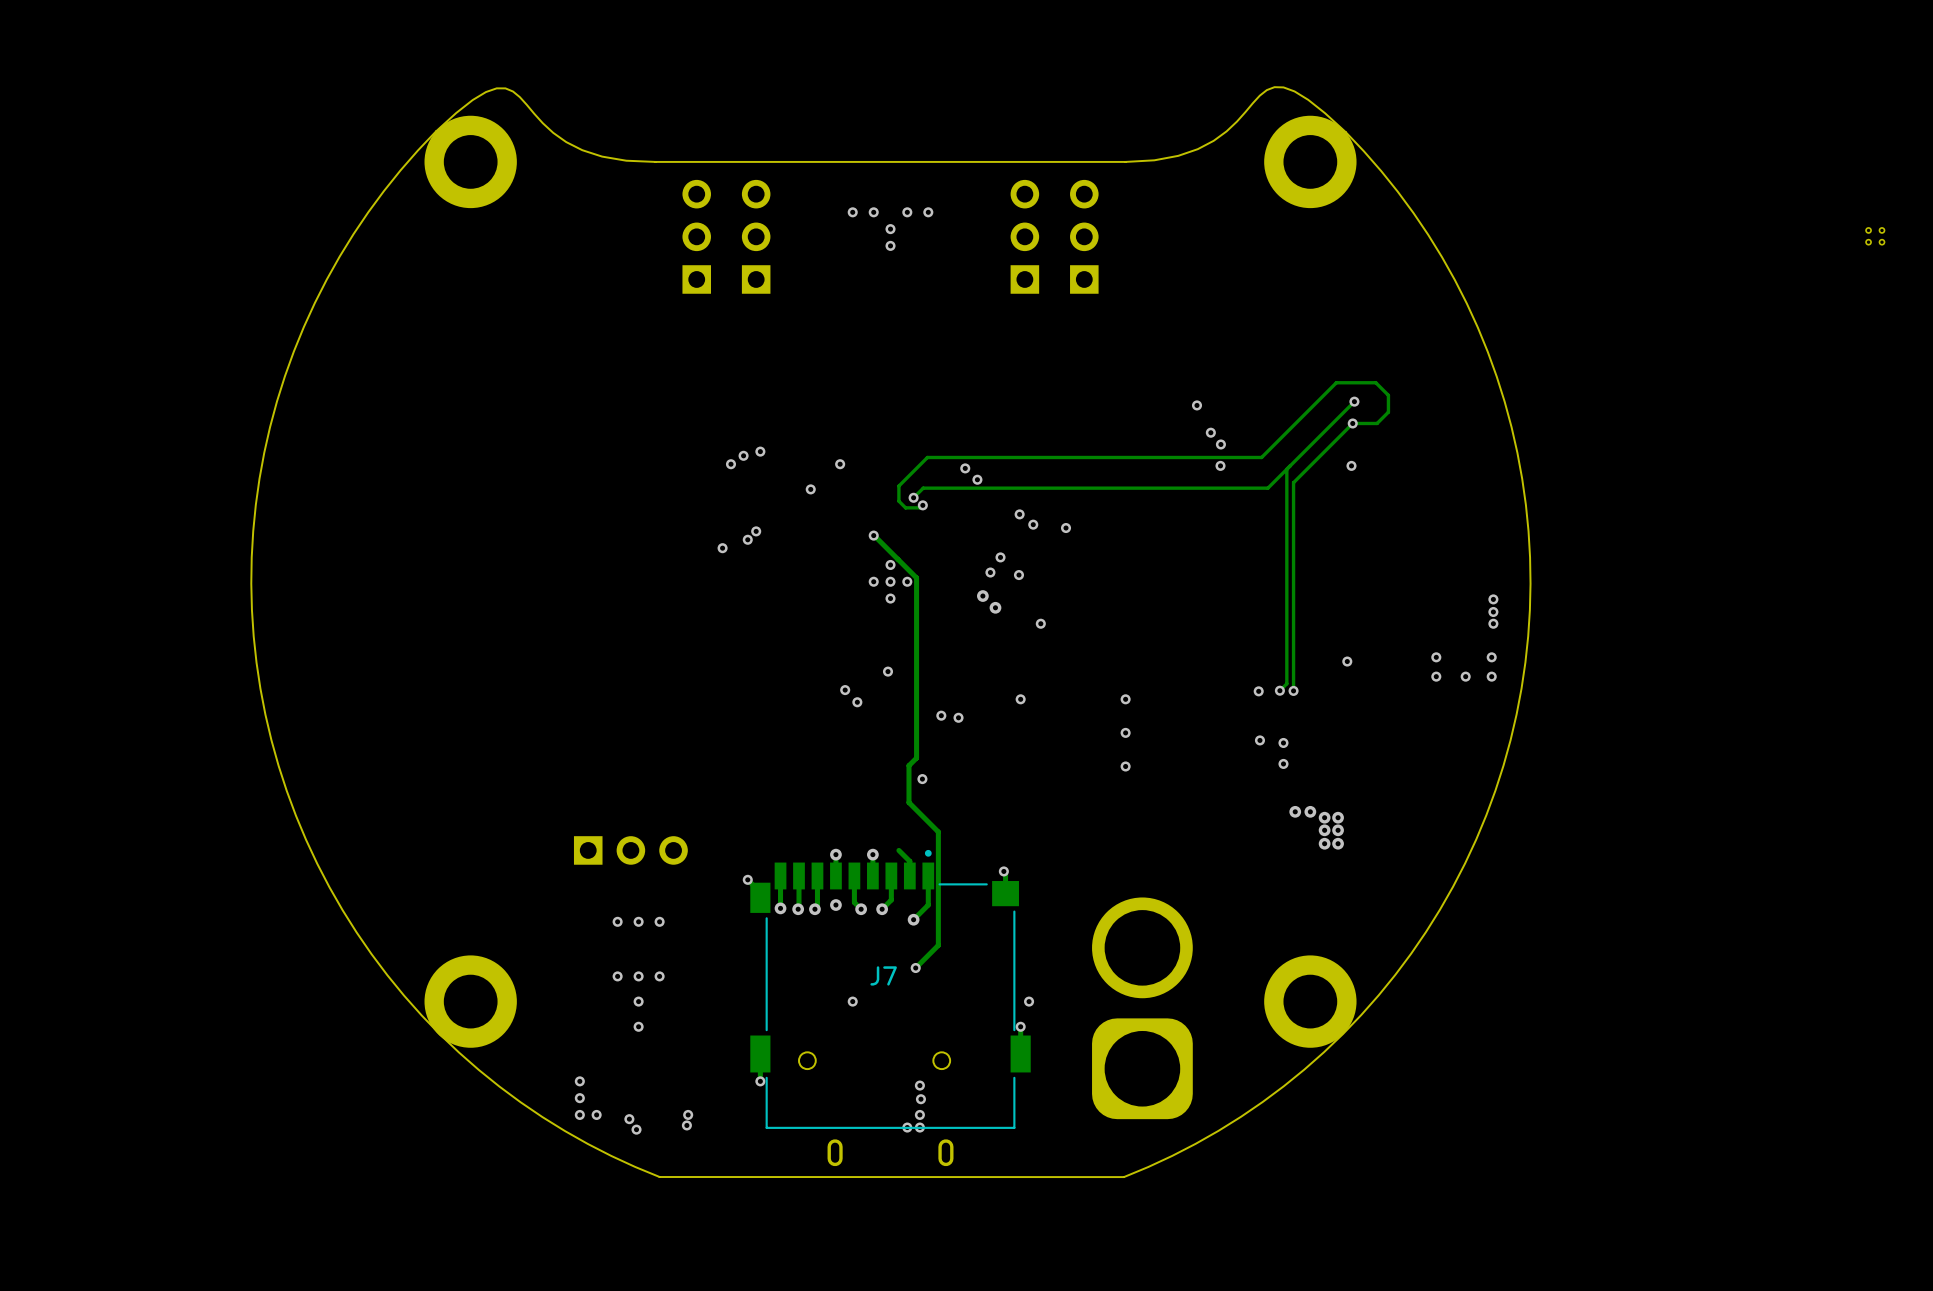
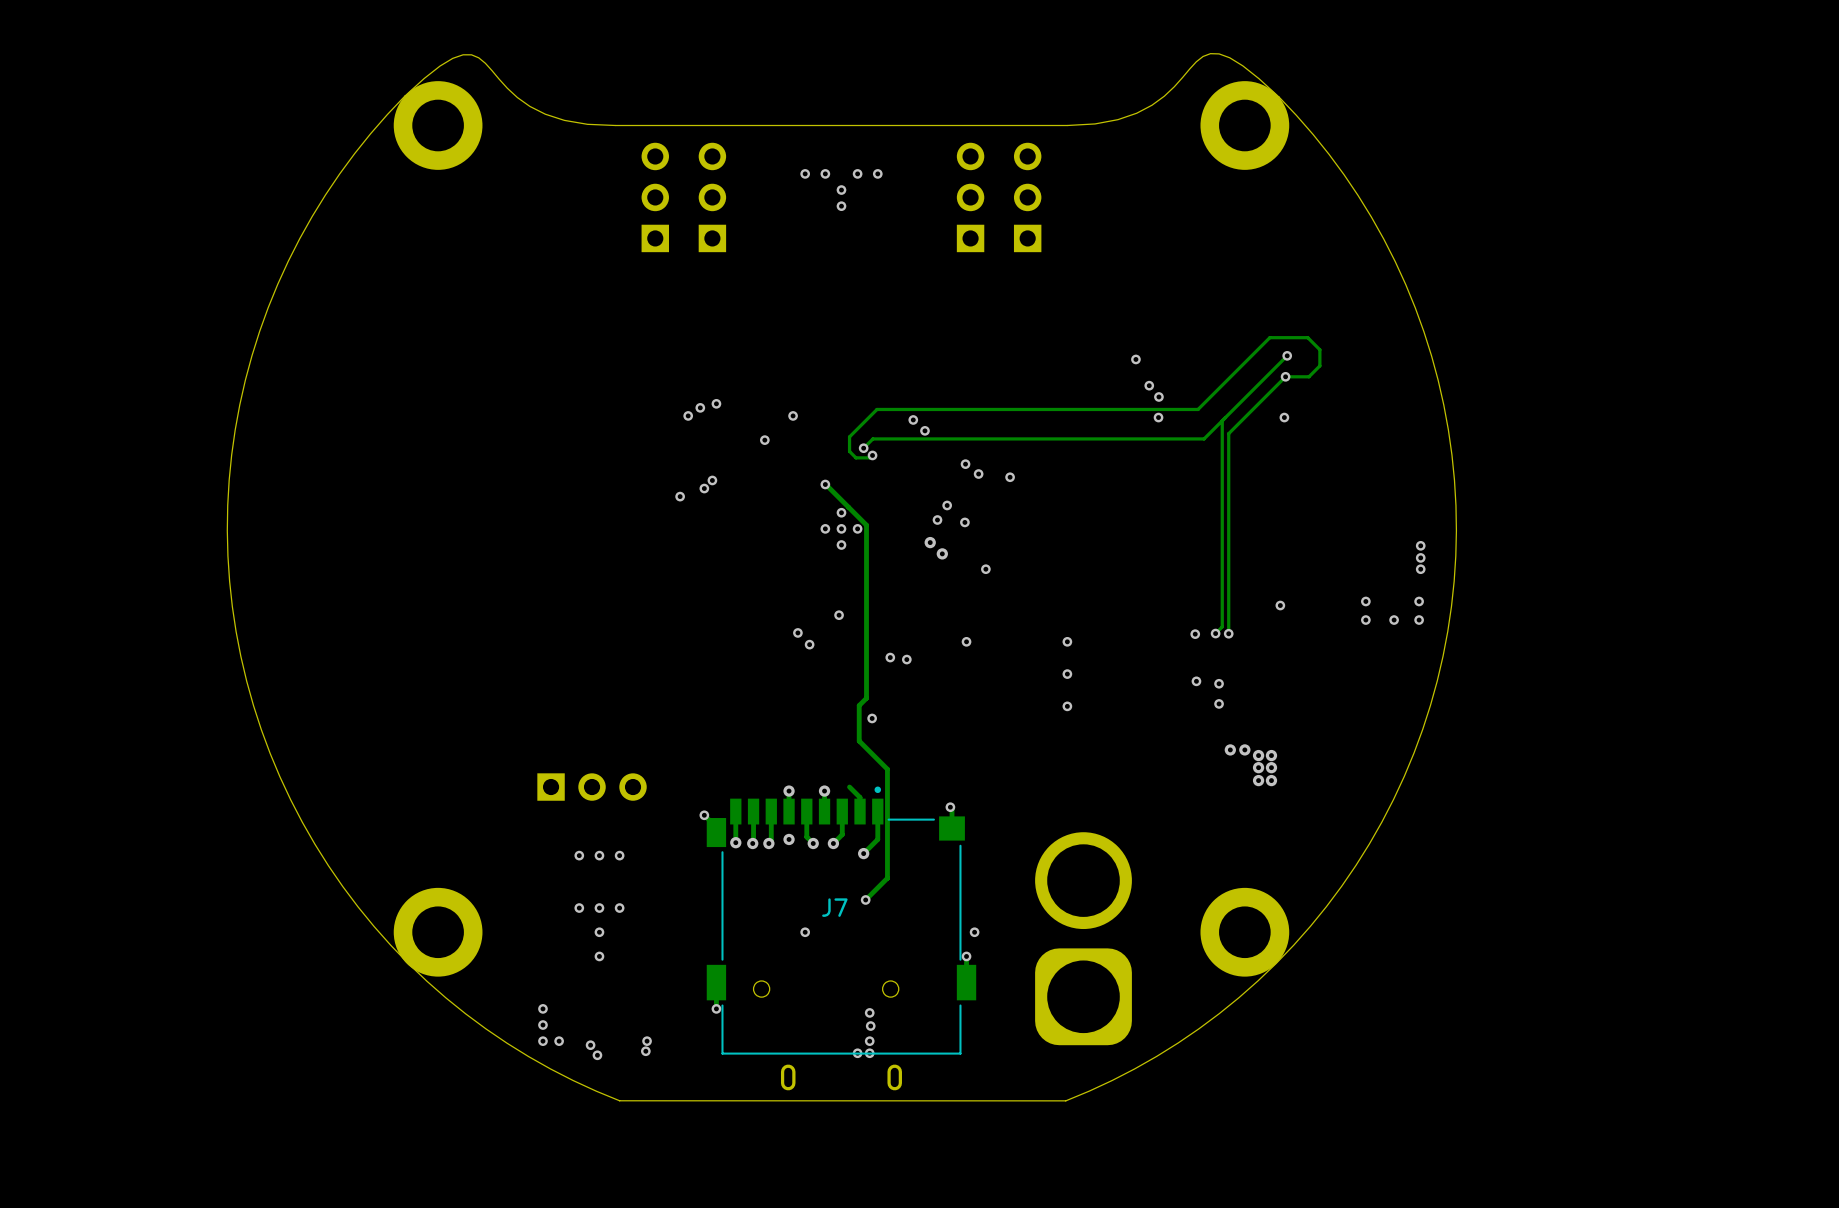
part: (1875, 236) -> none

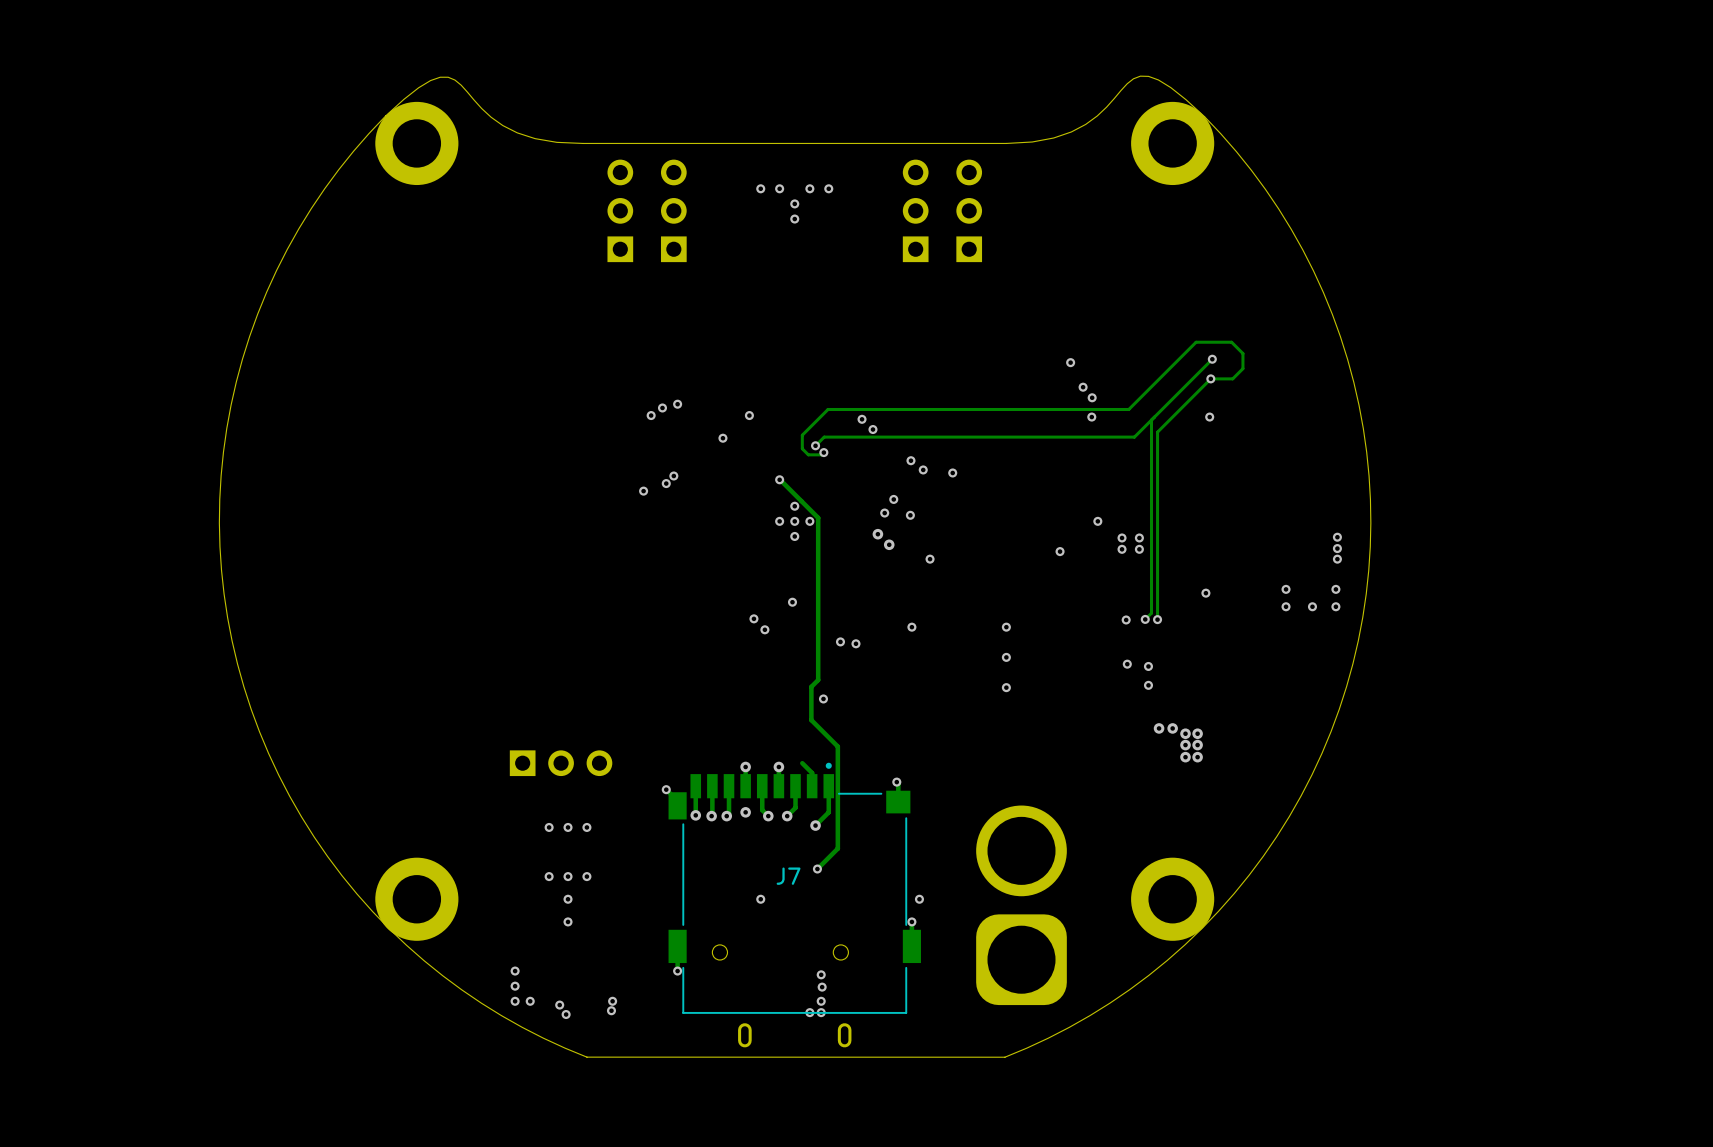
via: none -> (1097, 521)
via: none -> (1122, 537)
via: none -> (1139, 537)
via: none -> (1122, 549)
via: none -> (1139, 549)
via: none -> (1060, 551)

